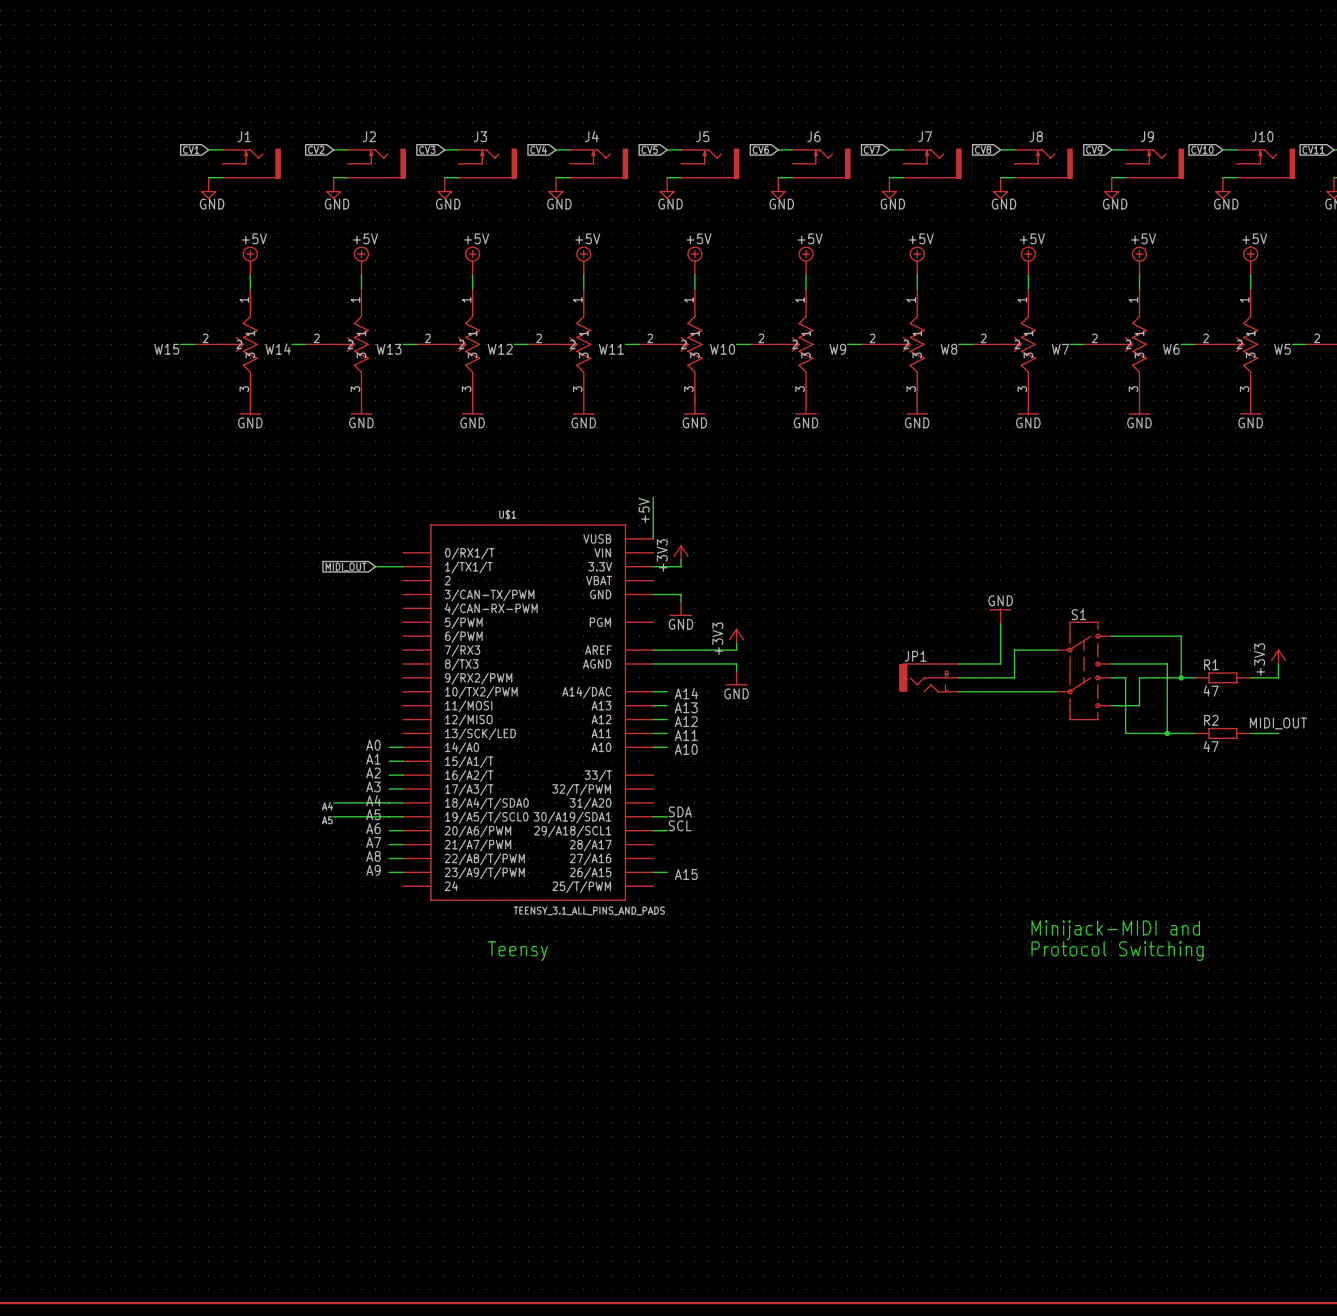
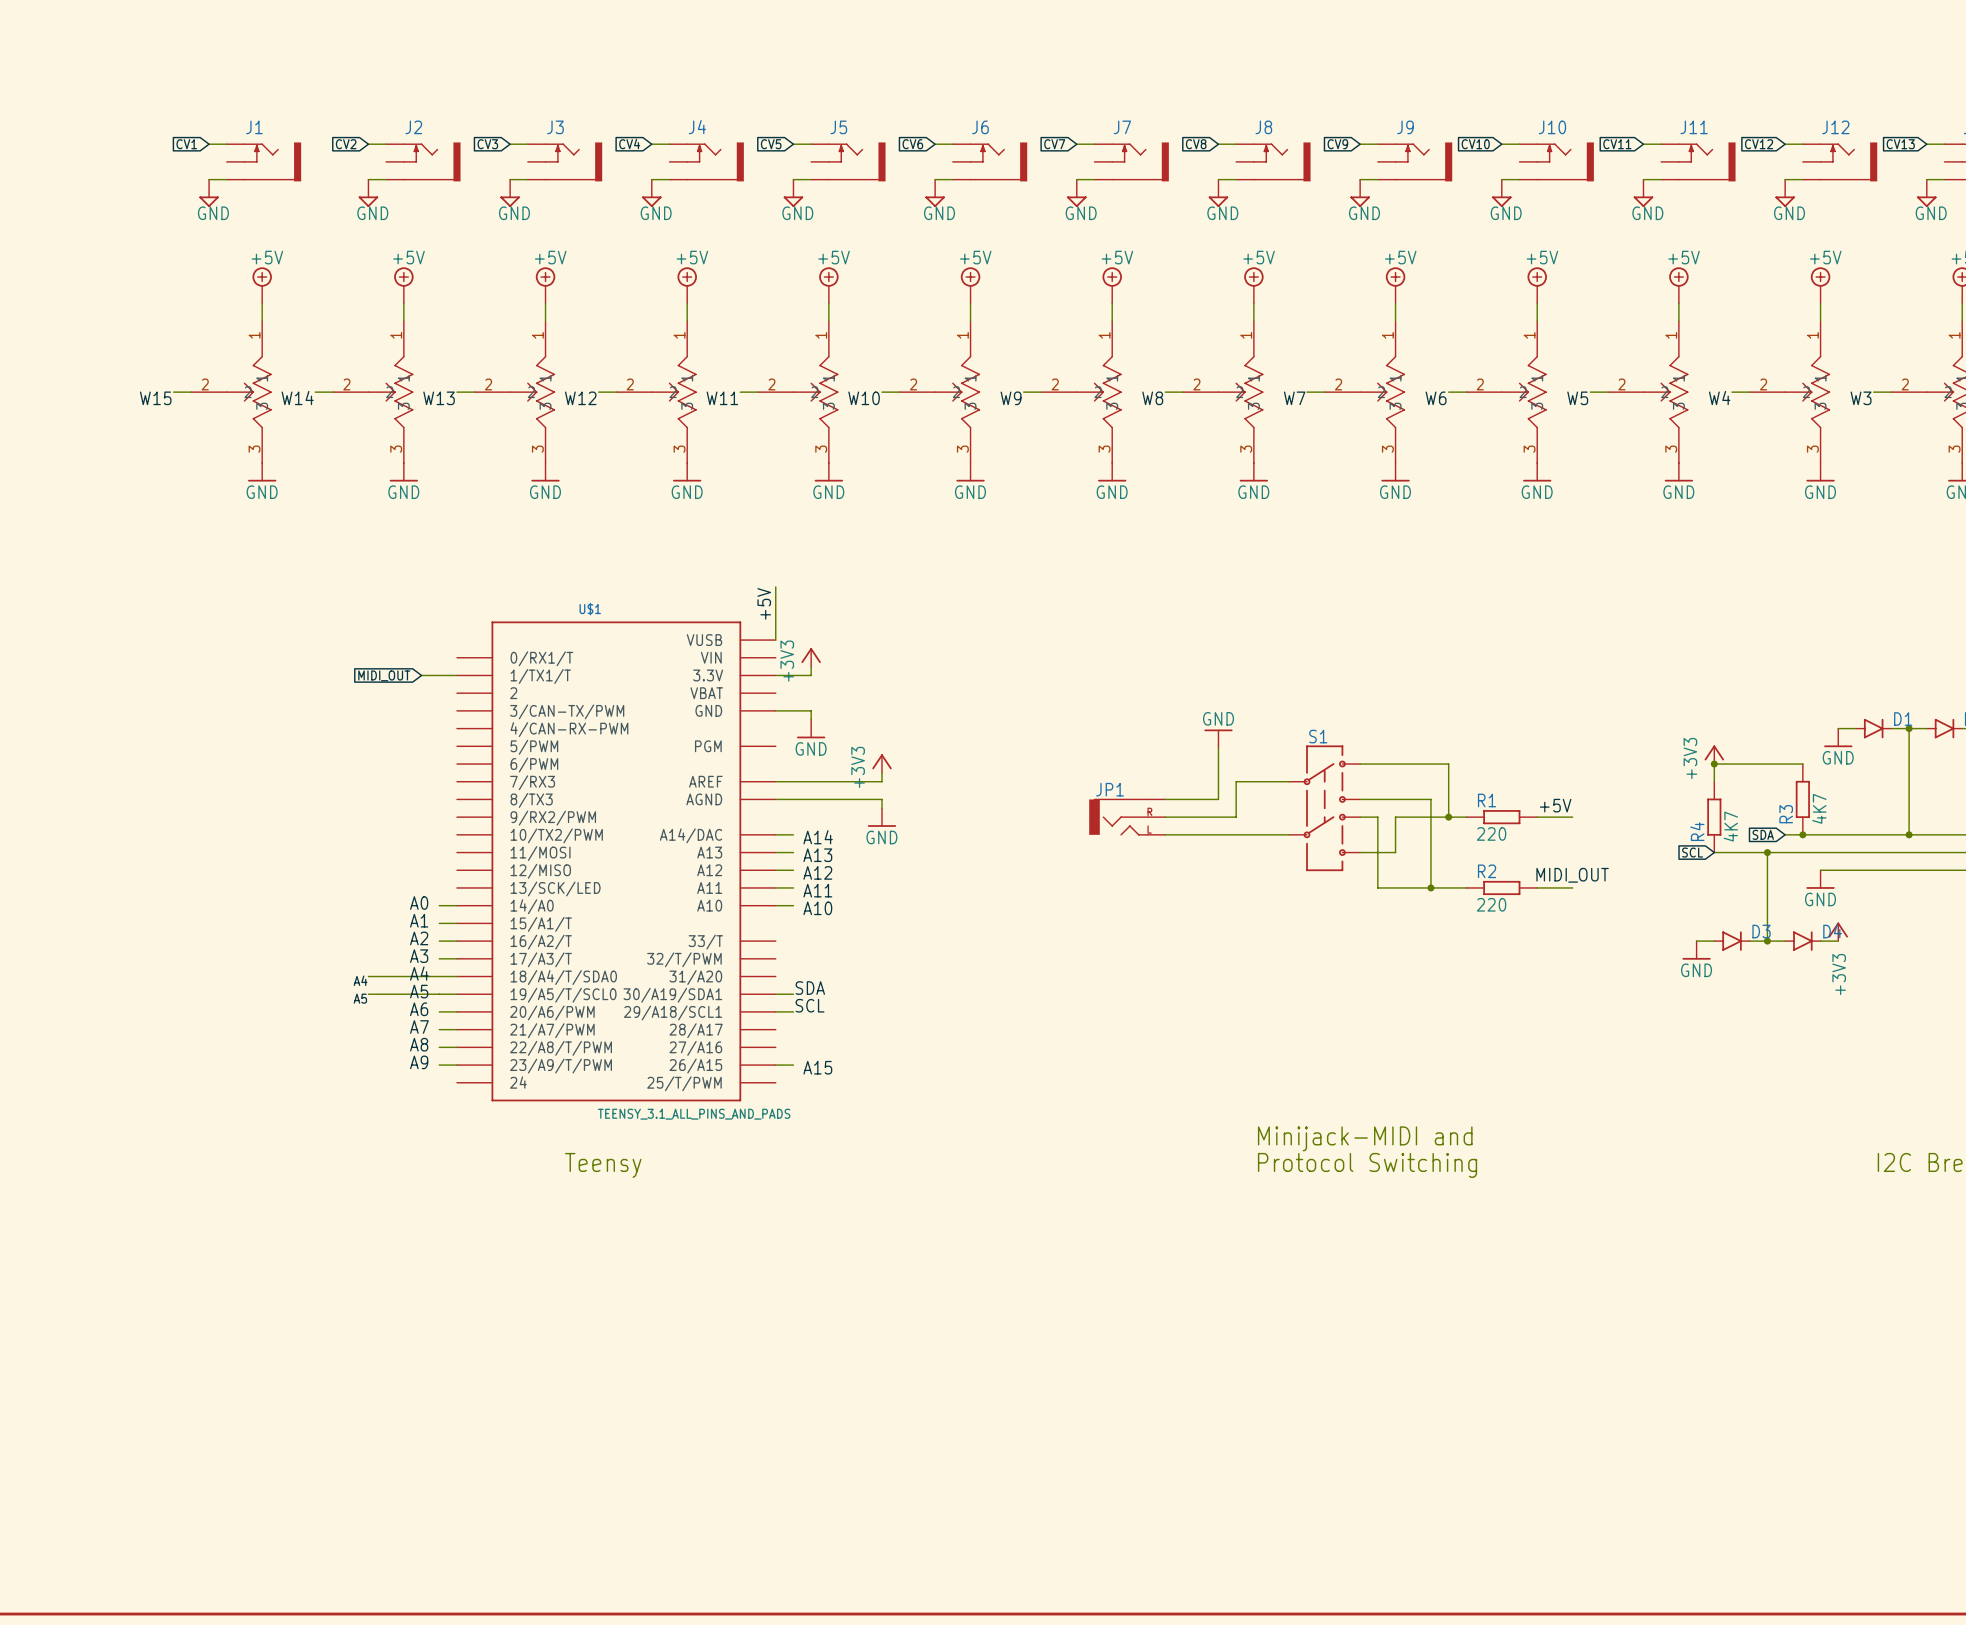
power symbol: +3V3 (1278, 656) -> none
wire: (1278, 663) (1278, 677) -> none
label: none -> +5V (1555, 805)
R1 value: 47 (1211, 690) -> 220 (1491, 833)
R2 value: 47 (1211, 746) -> 220 (1491, 904)

